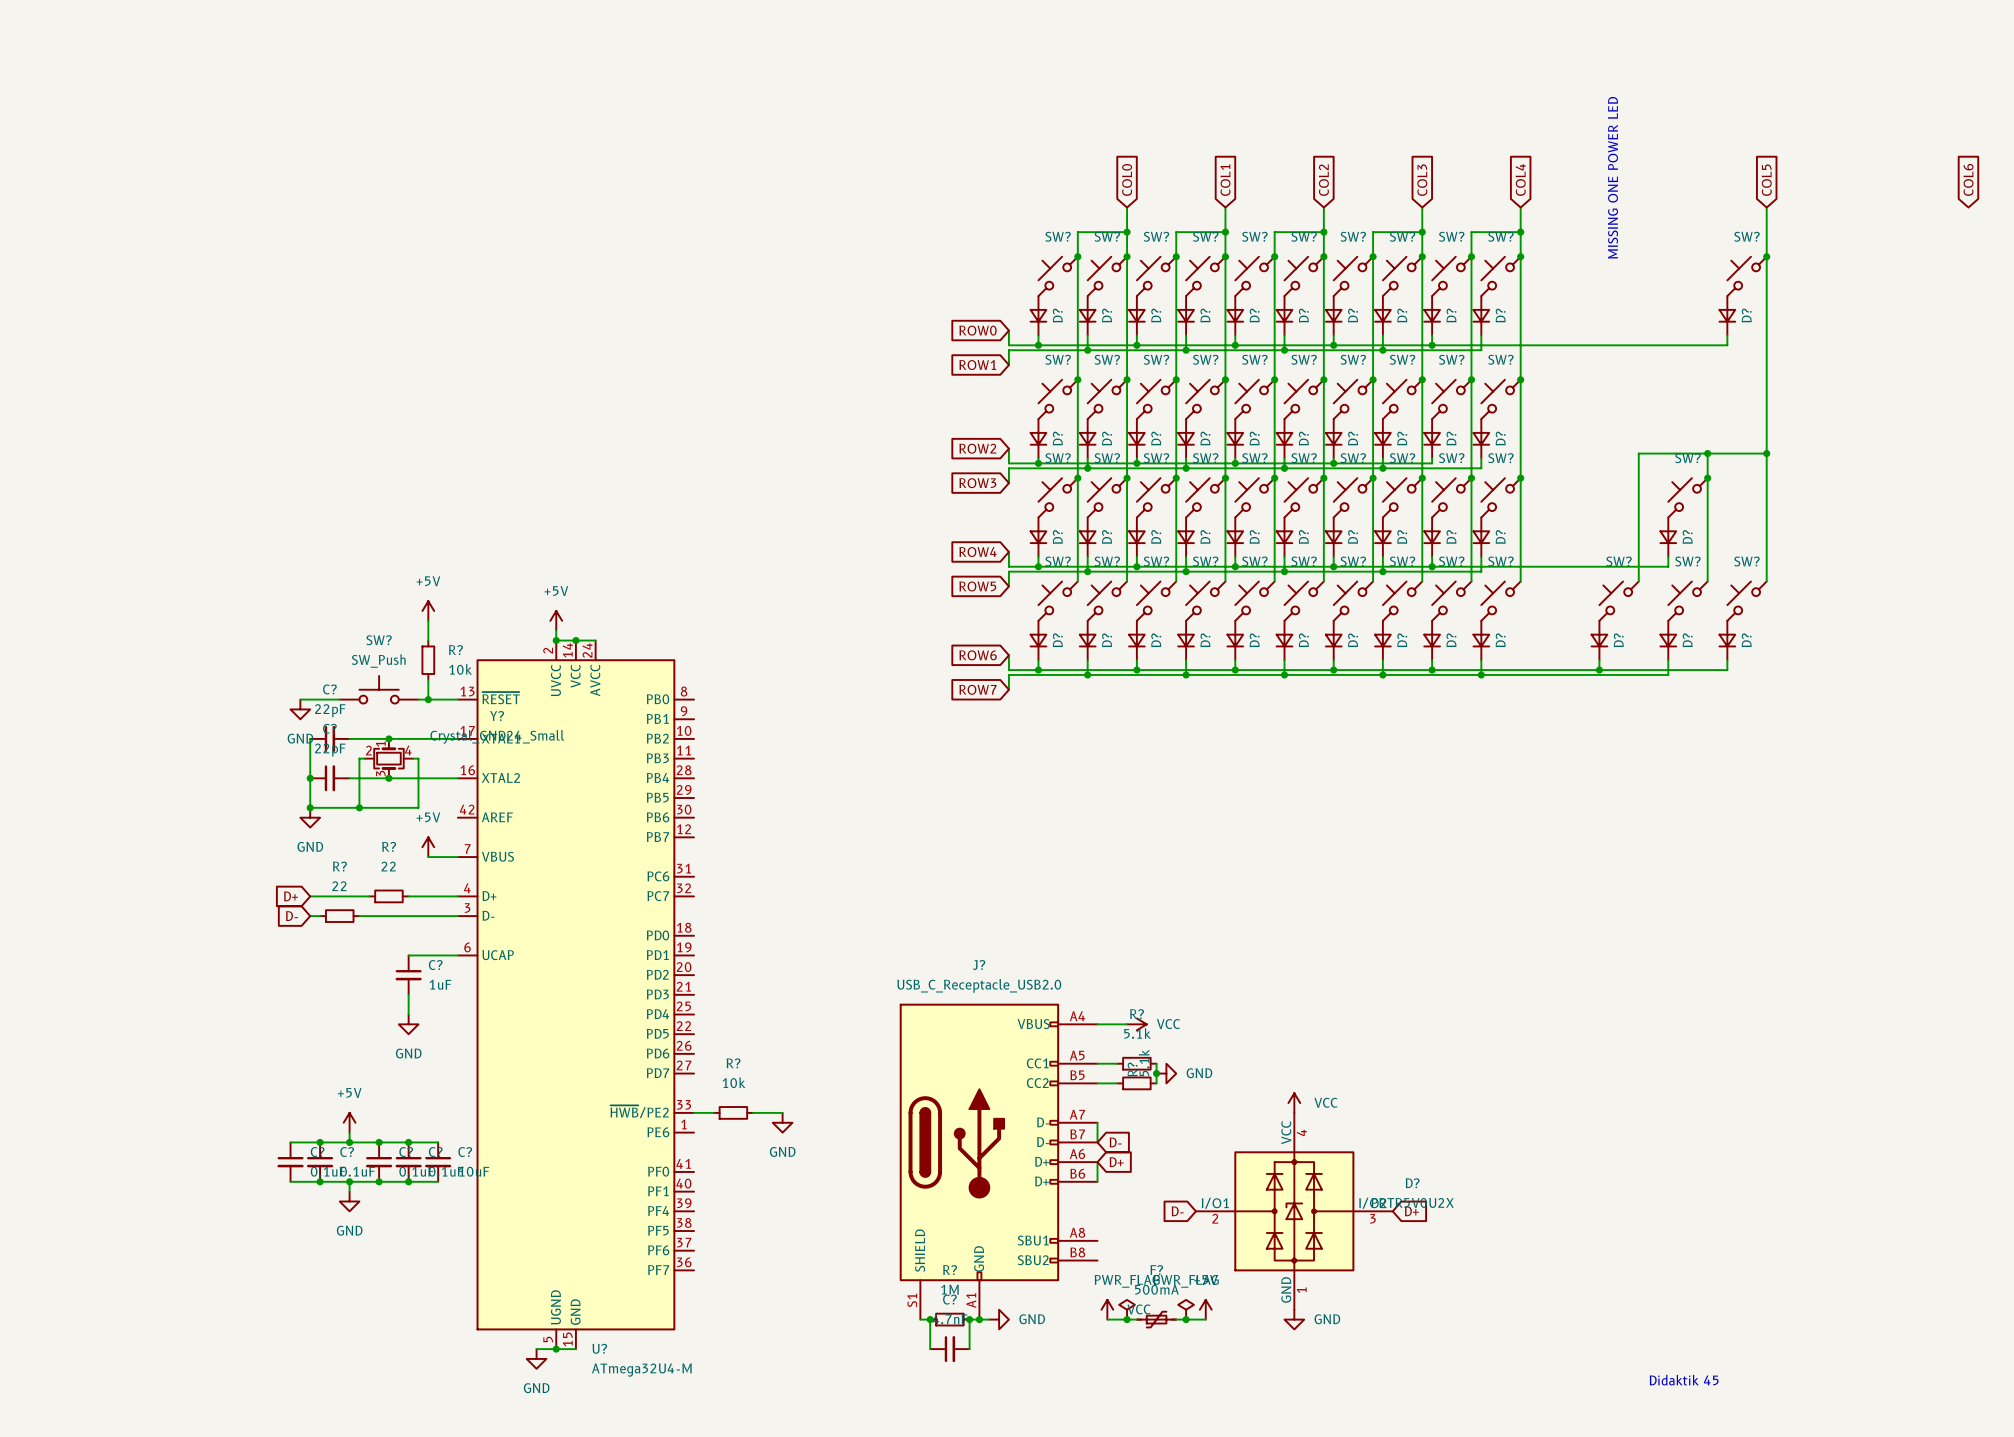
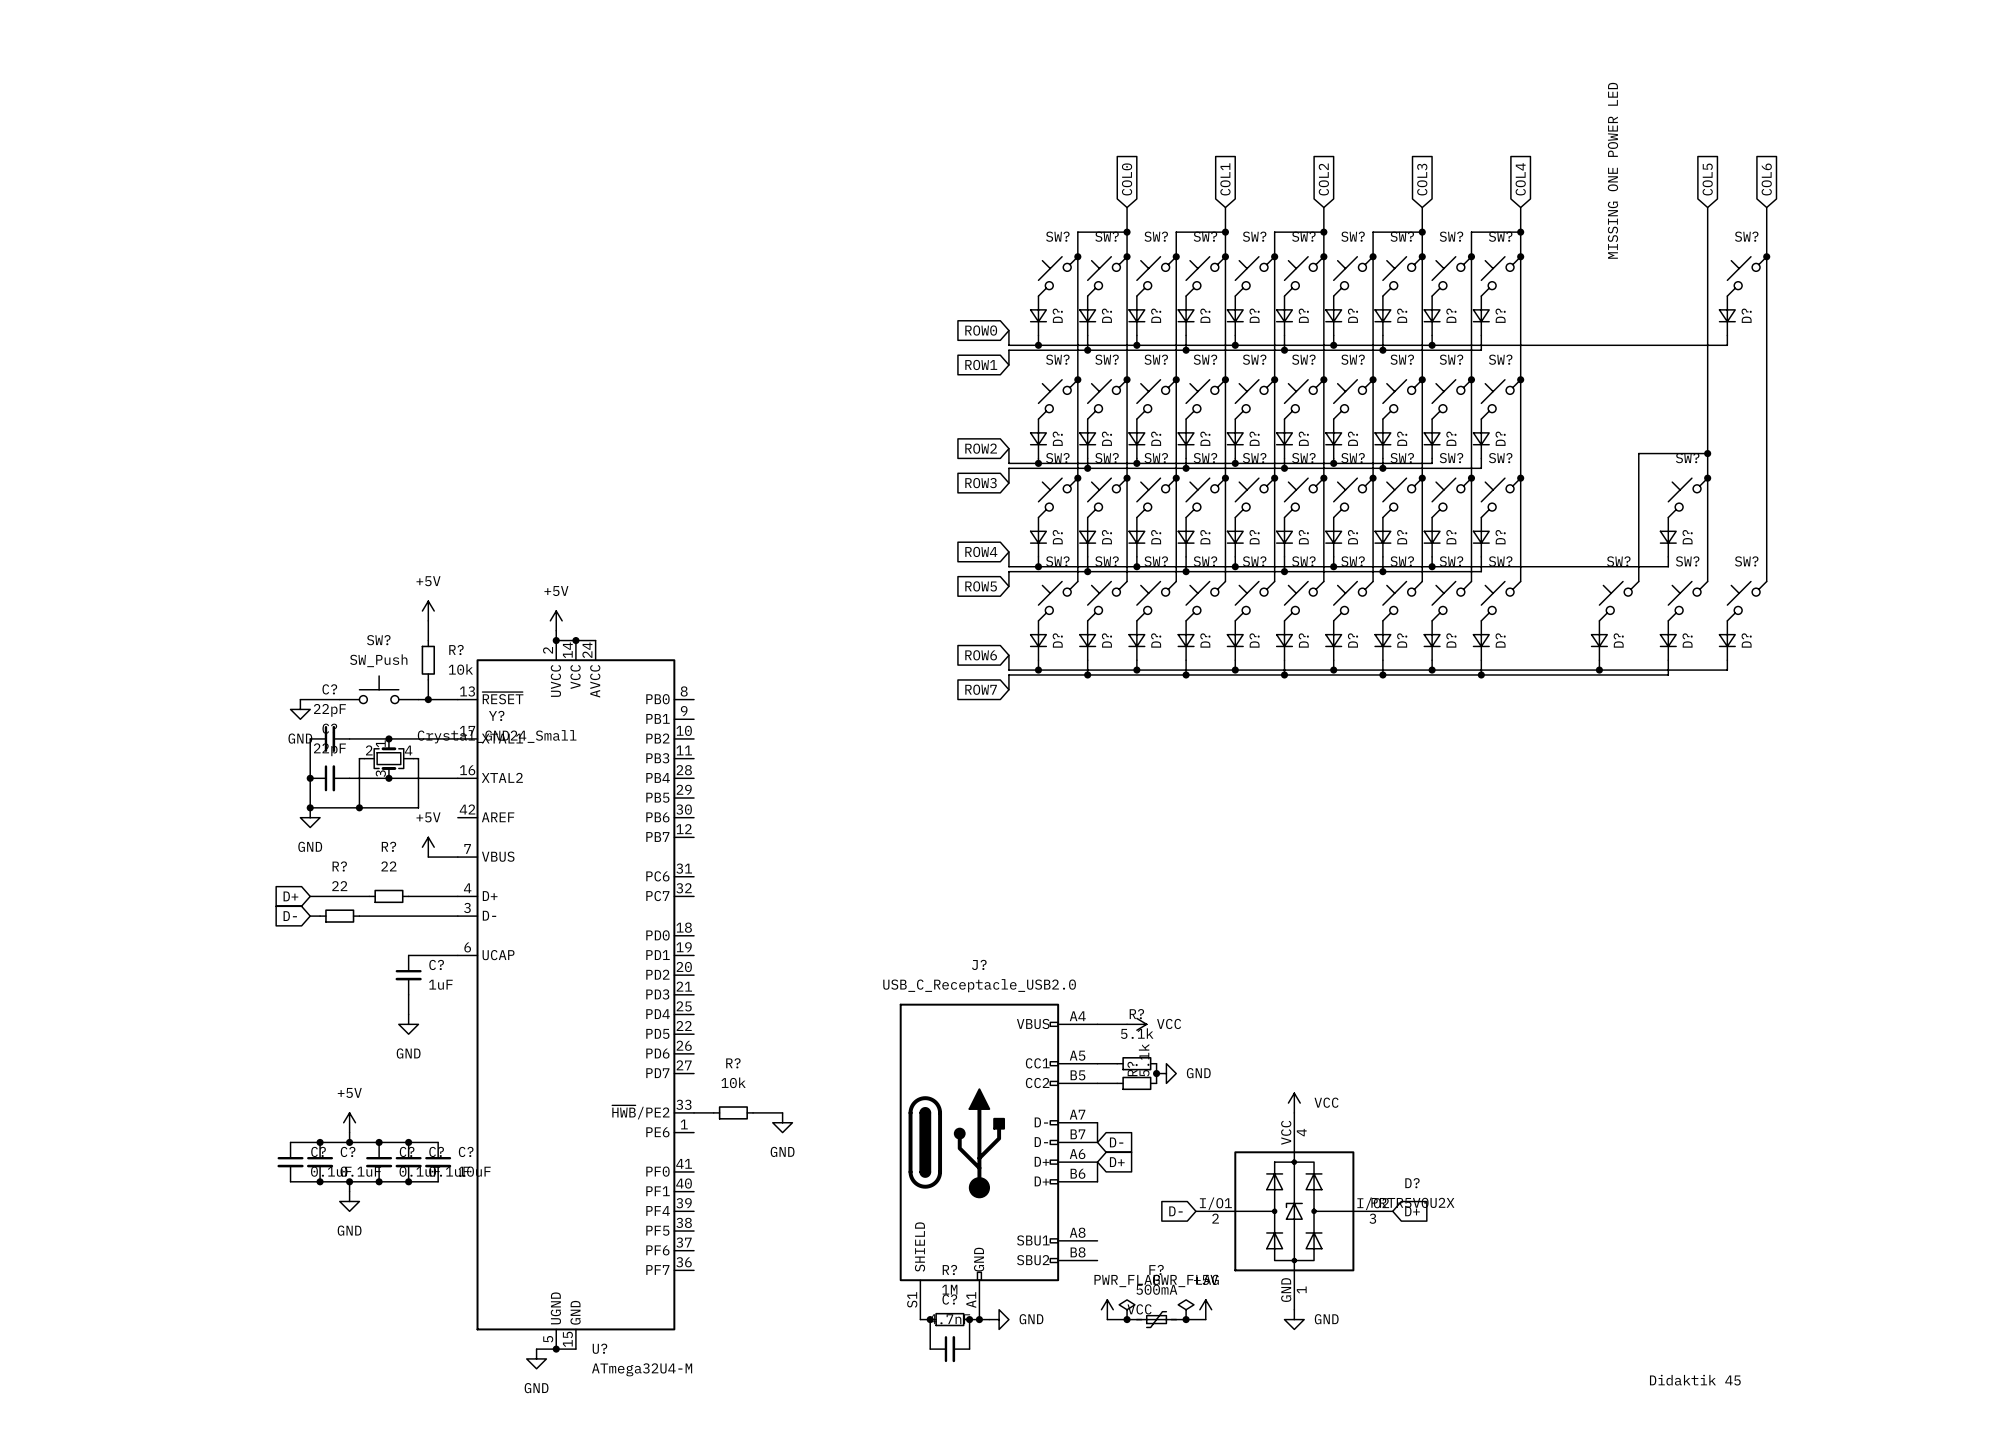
global label: COL6 (1968, 179) -> none
global label: none -> COL5 (1707, 179)
global label: COL5 (1766, 180) -> COL6 (1766, 179)
wire: (1707, 453) (1766, 453) -> (1707, 453) (1707, 207)
junction: (1766, 453) -> none

